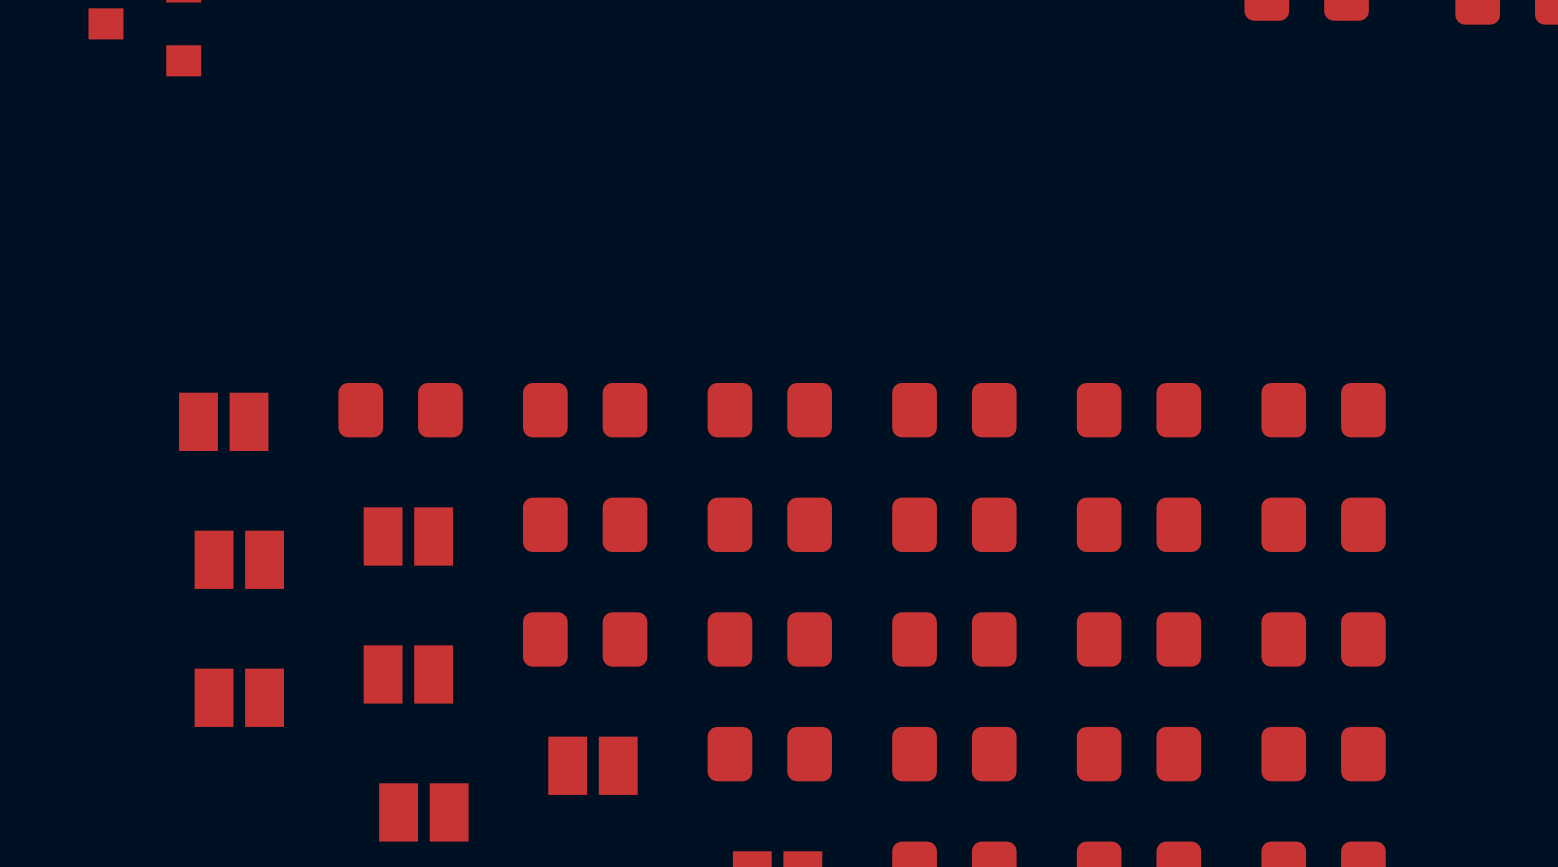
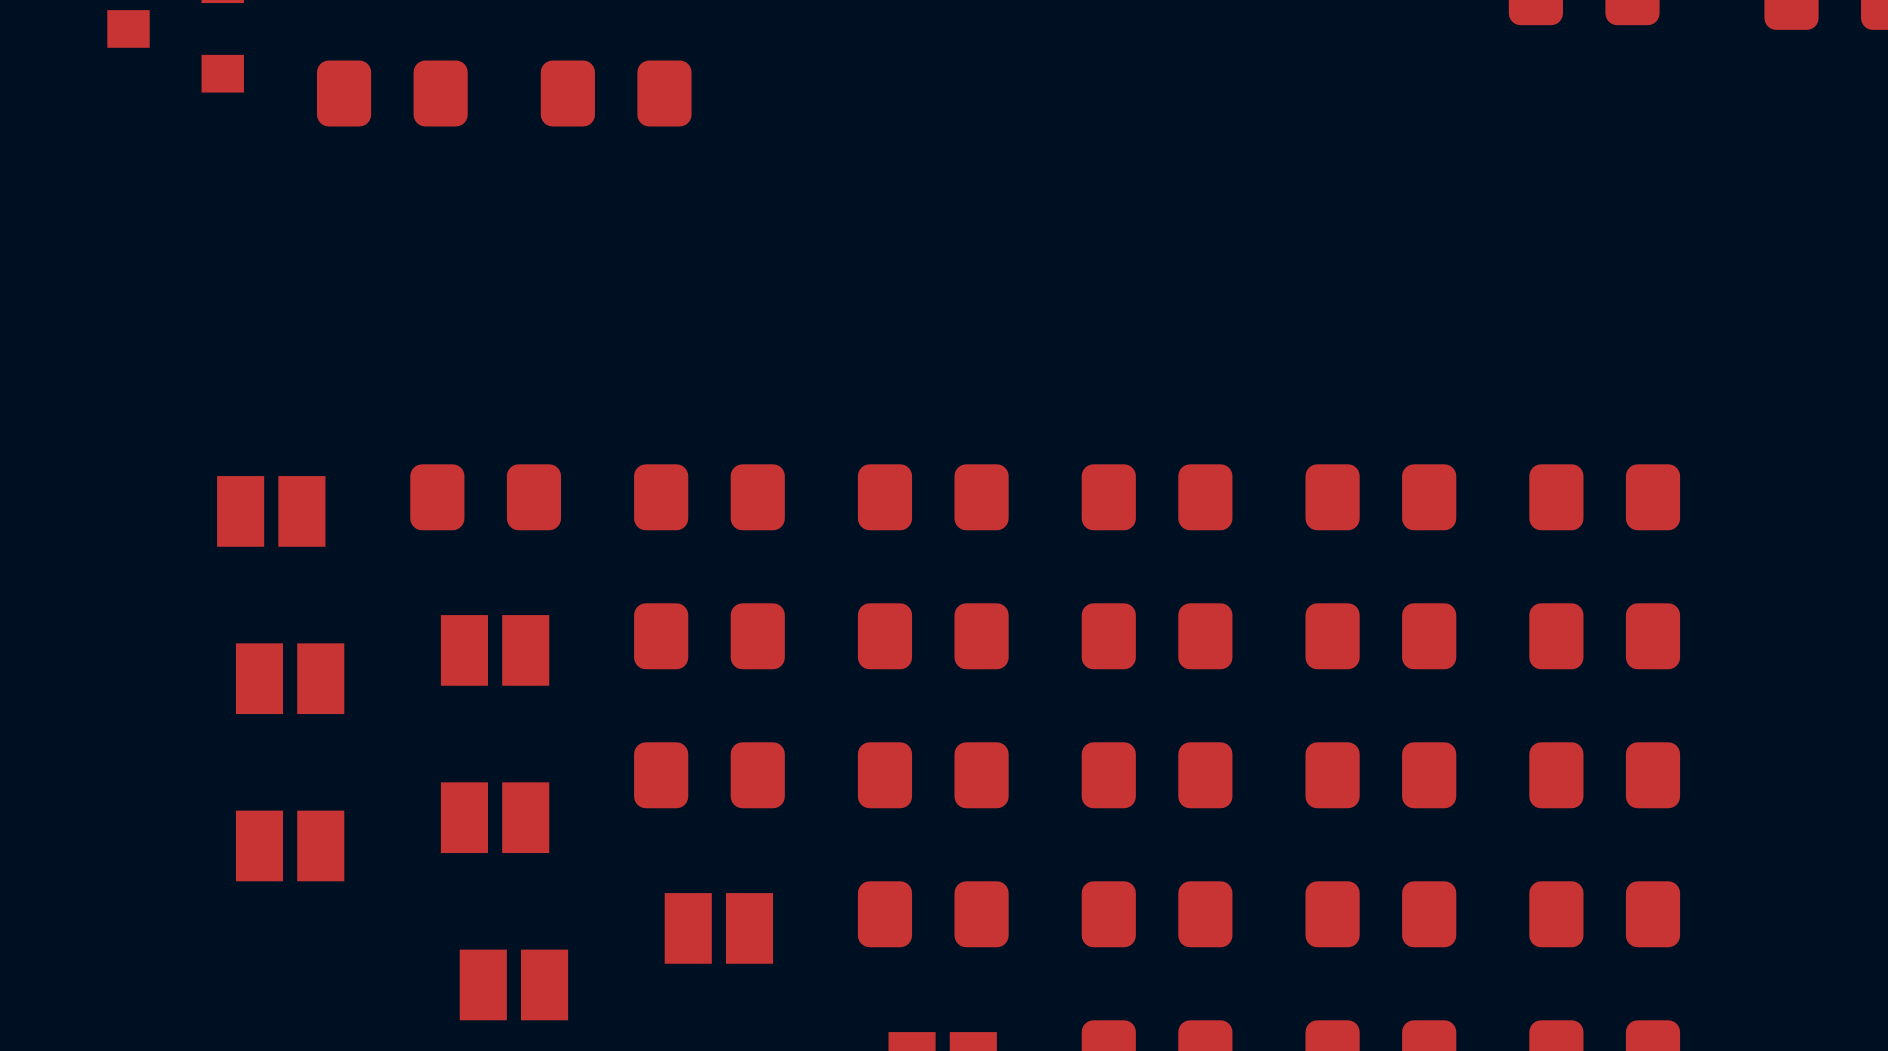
part: none -> (392, 93)
part: none -> (616, 93)

